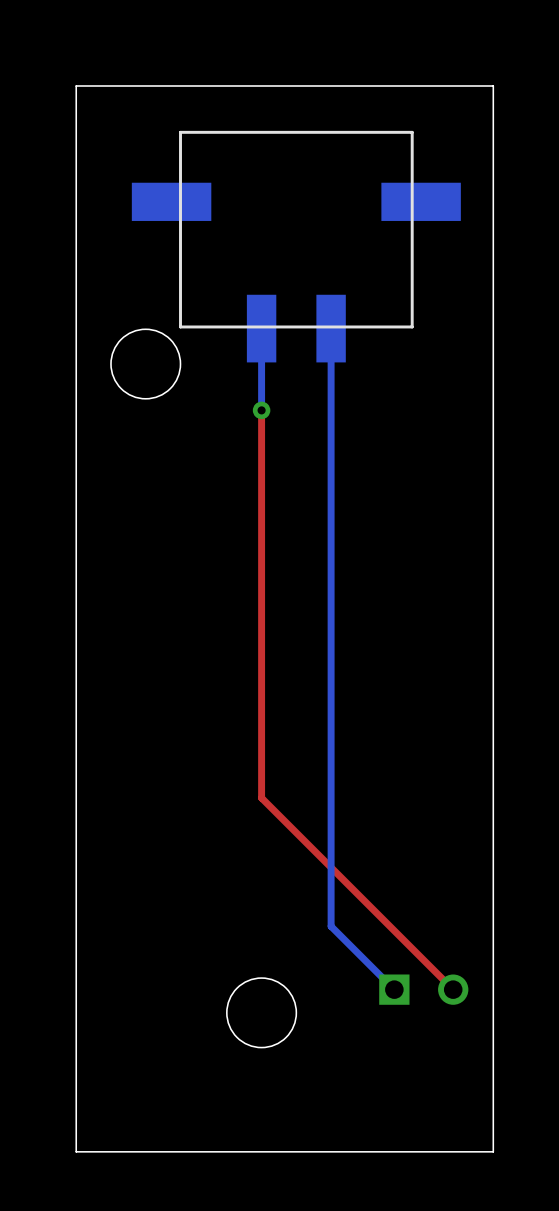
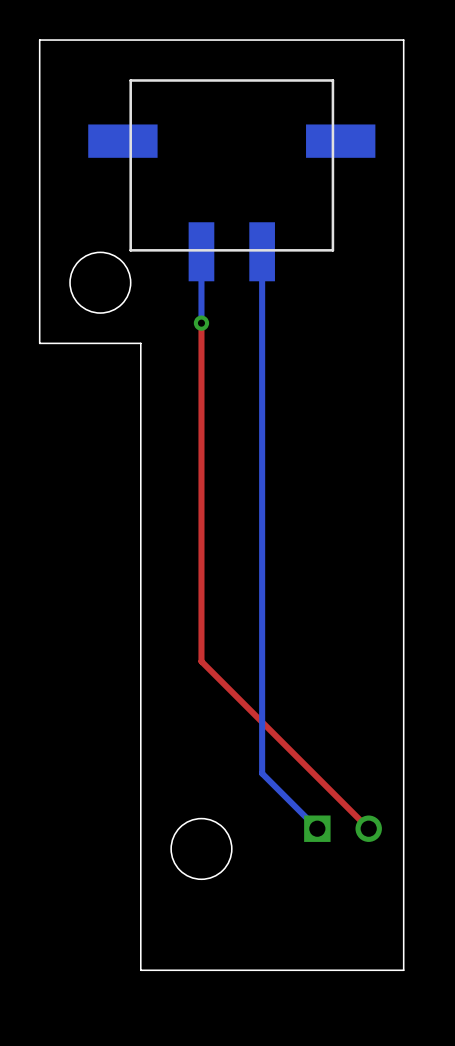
board edge: (76, 433) (76, 1151) (192, 1151) -> (39, 343) (140, 343) (140, 970)

